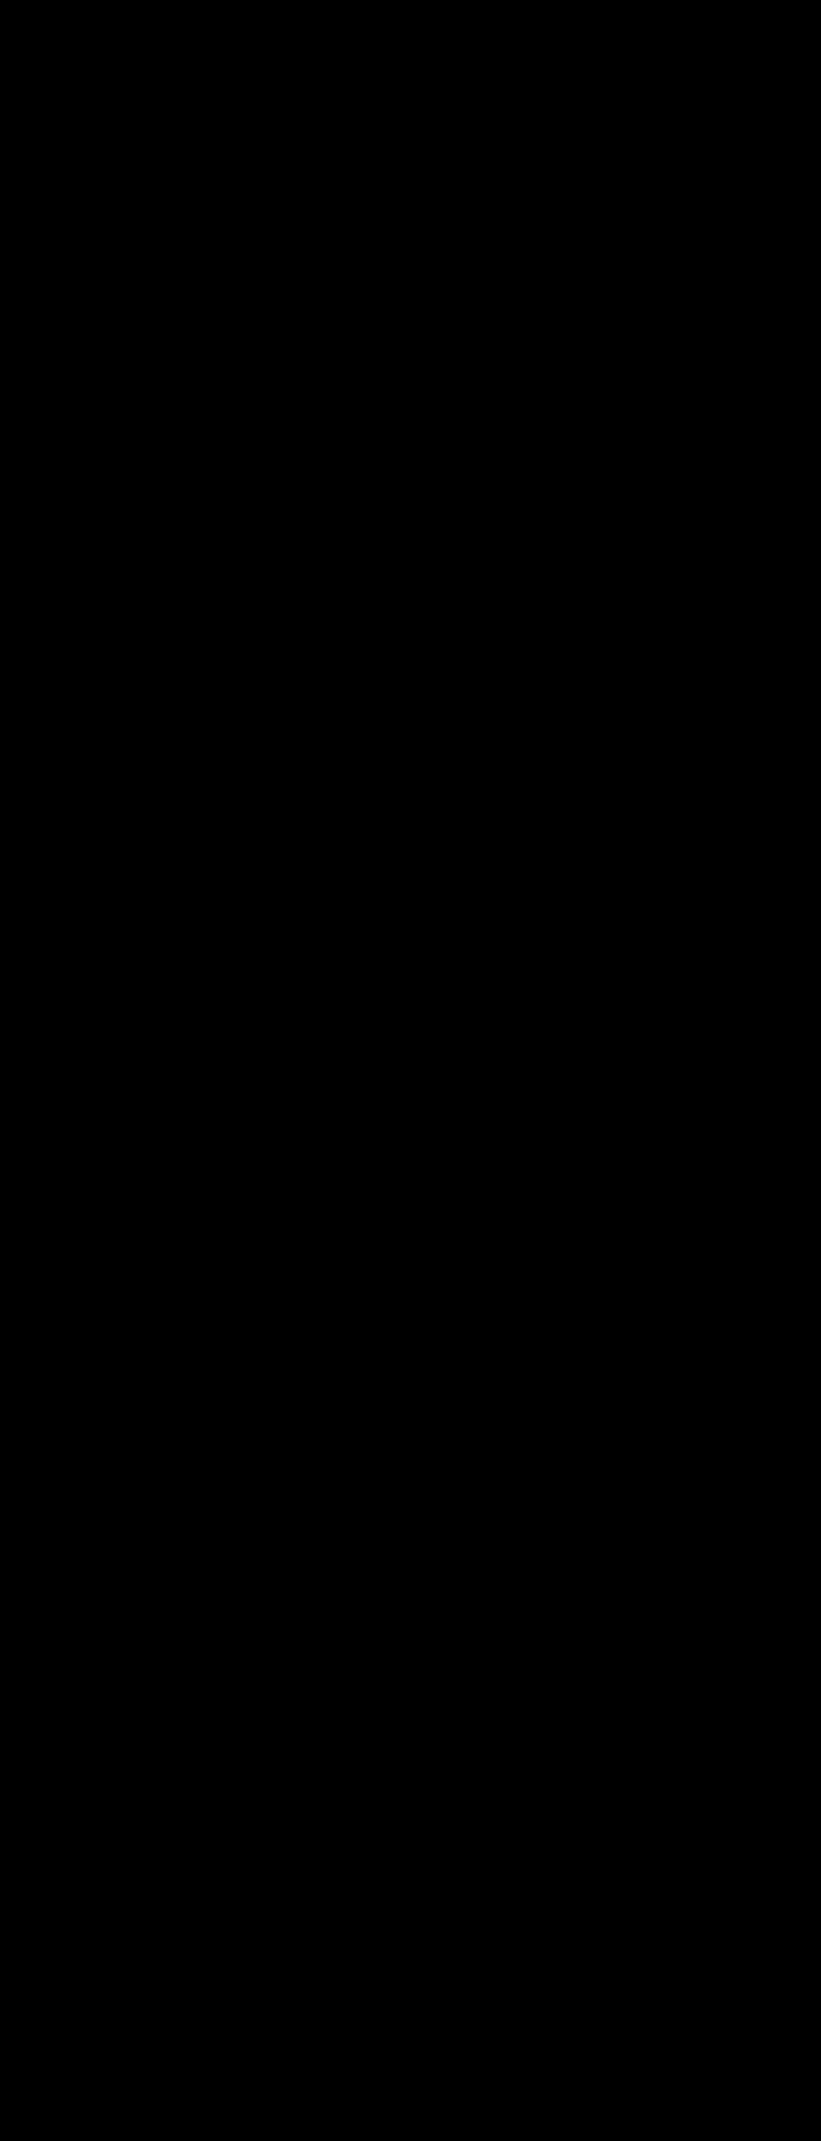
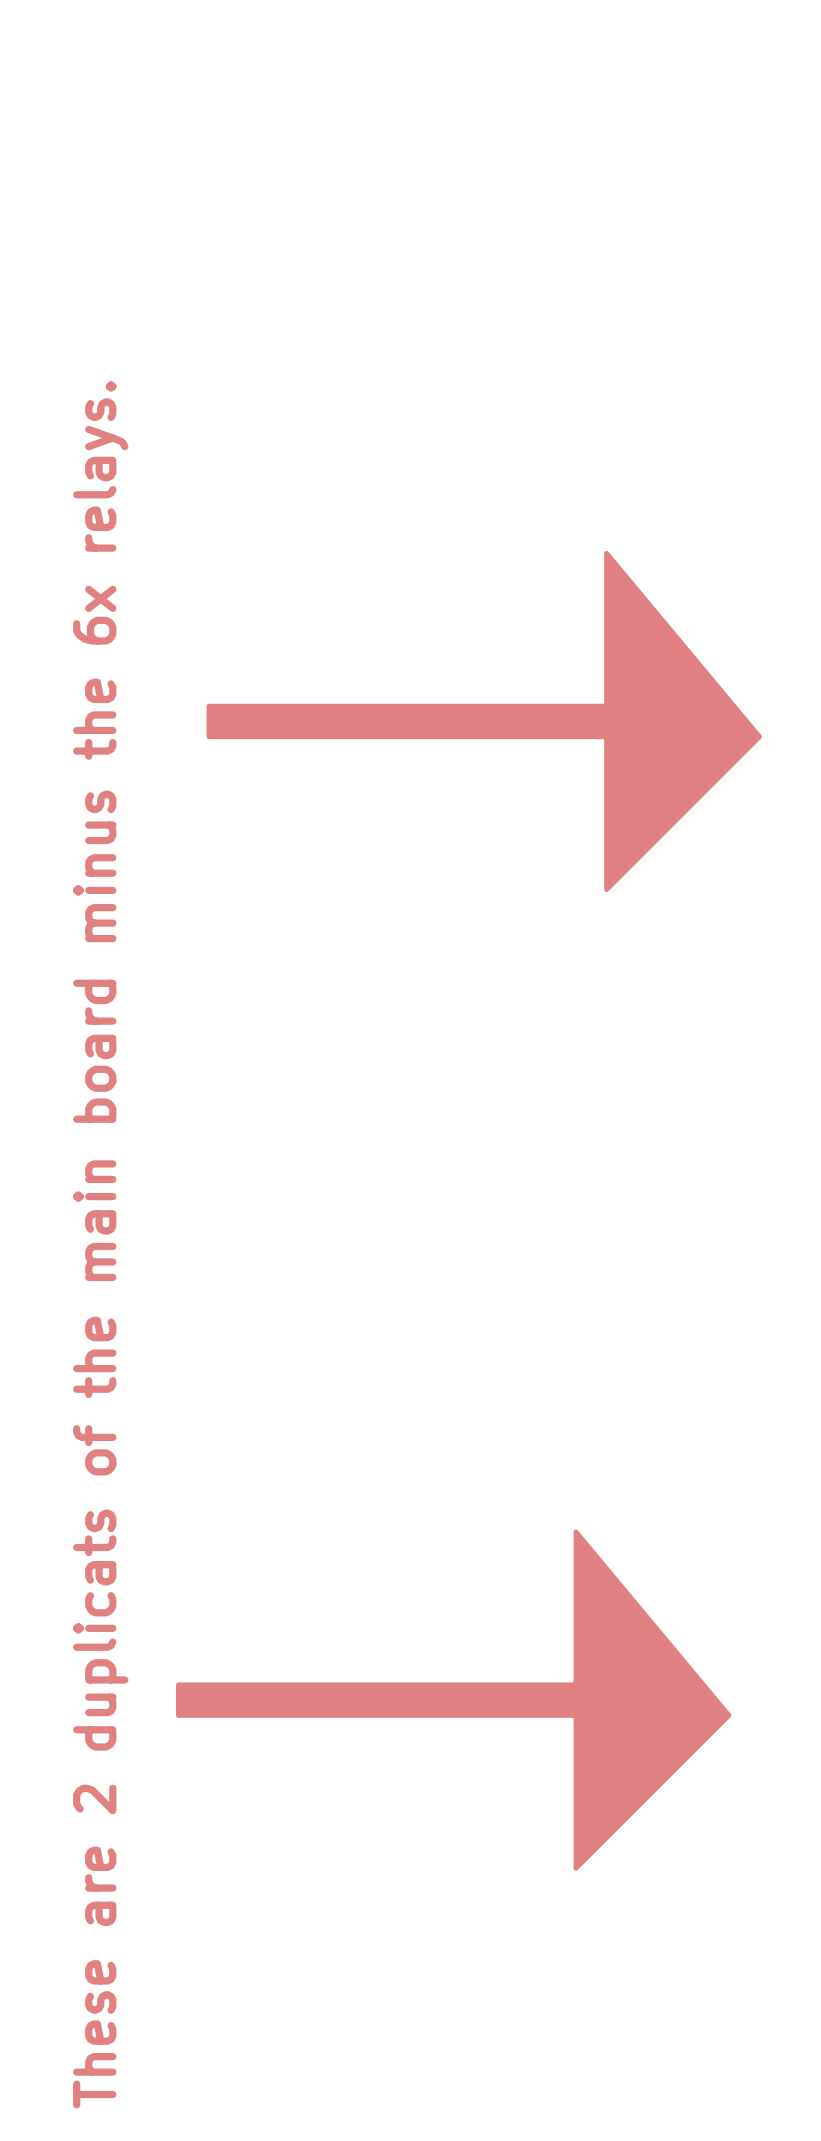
drawing: none -> [206, 550, 762, 893]
text: none -> These are 2 duplicats of the main board minus the 6x relays. (100, 1244)
drawing: none -> [176, 1529, 732, 1871]

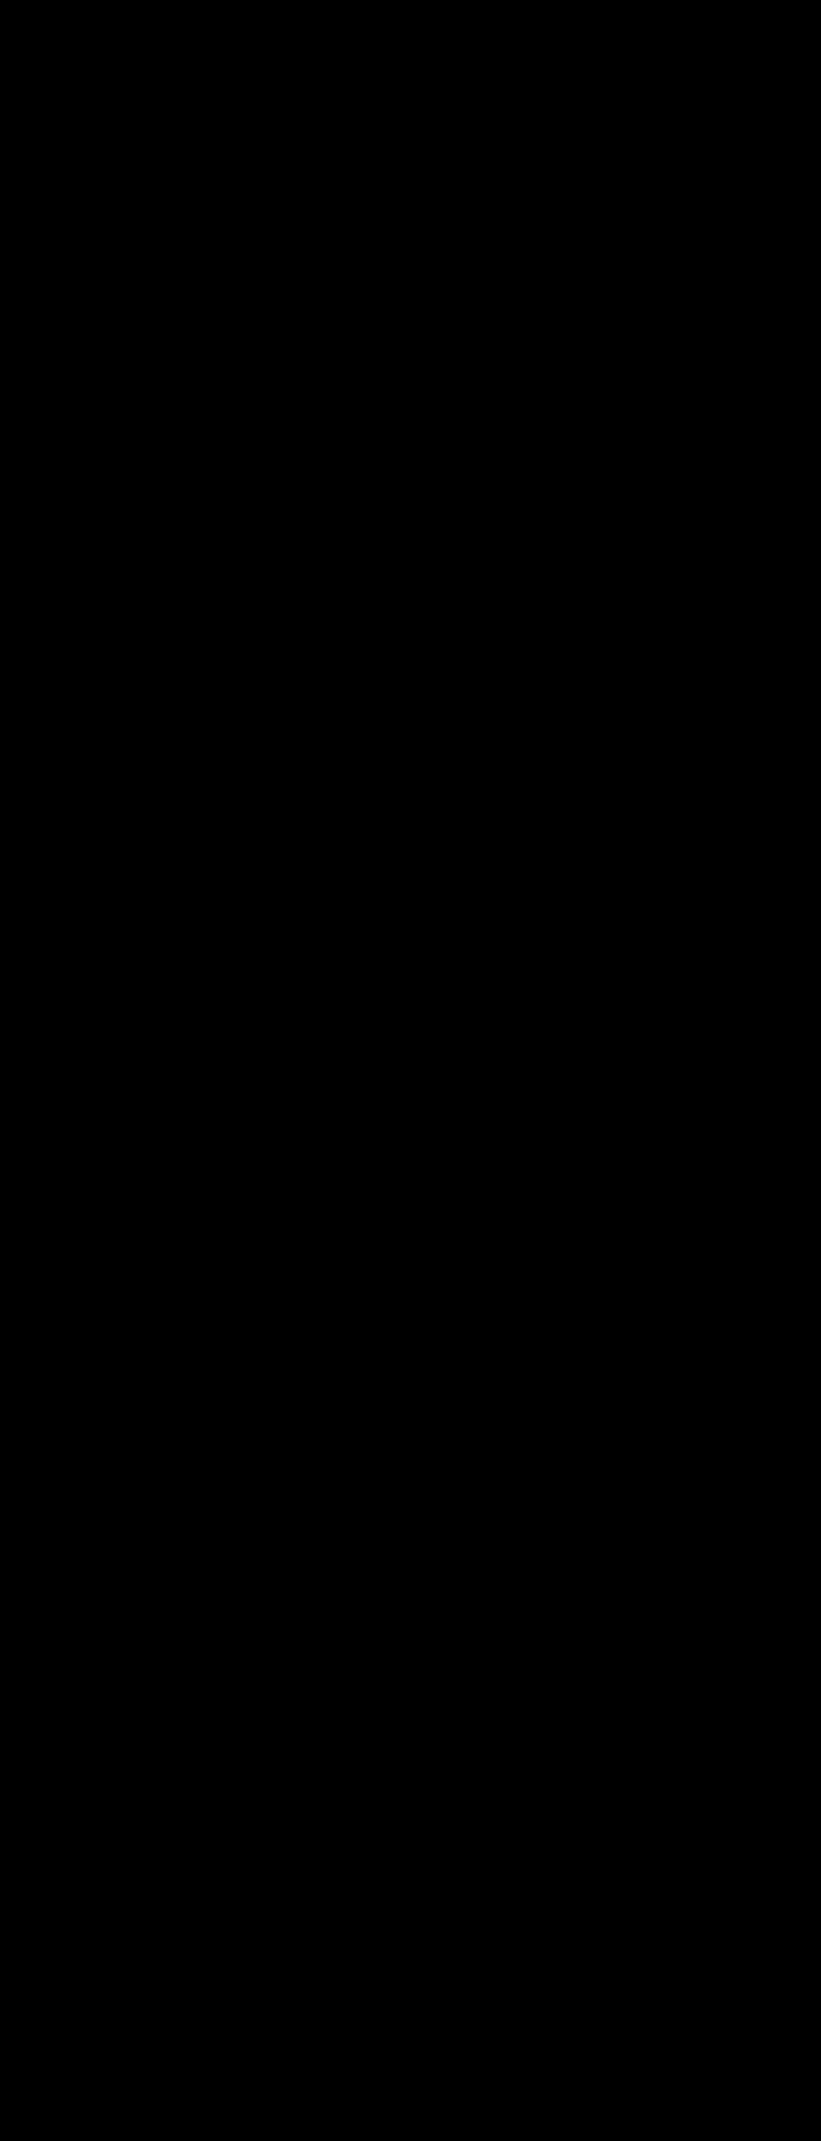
drawing: [206, 550, 762, 893] -> none
text: These are 2 duplicats of the main board minus the 6x relays. (100, 1244) -> none
drawing: [176, 1529, 732, 1871] -> none

